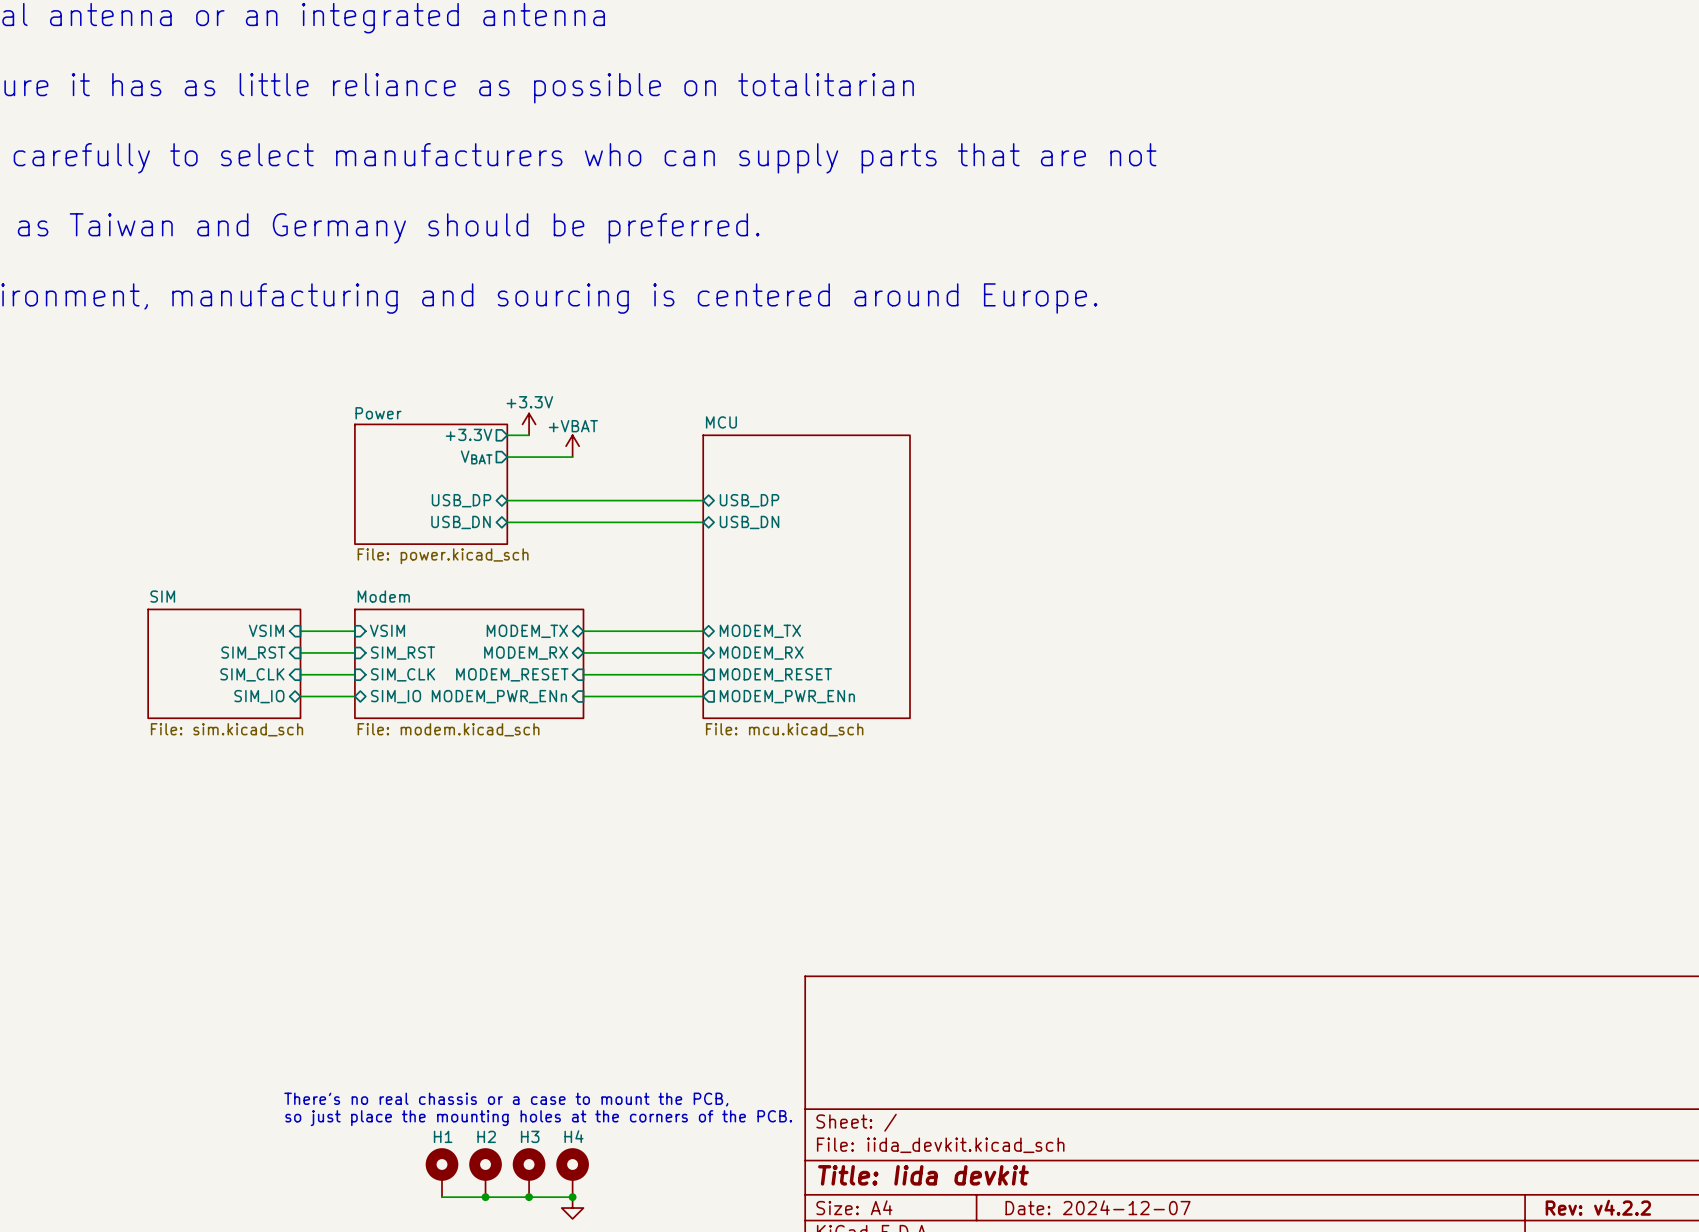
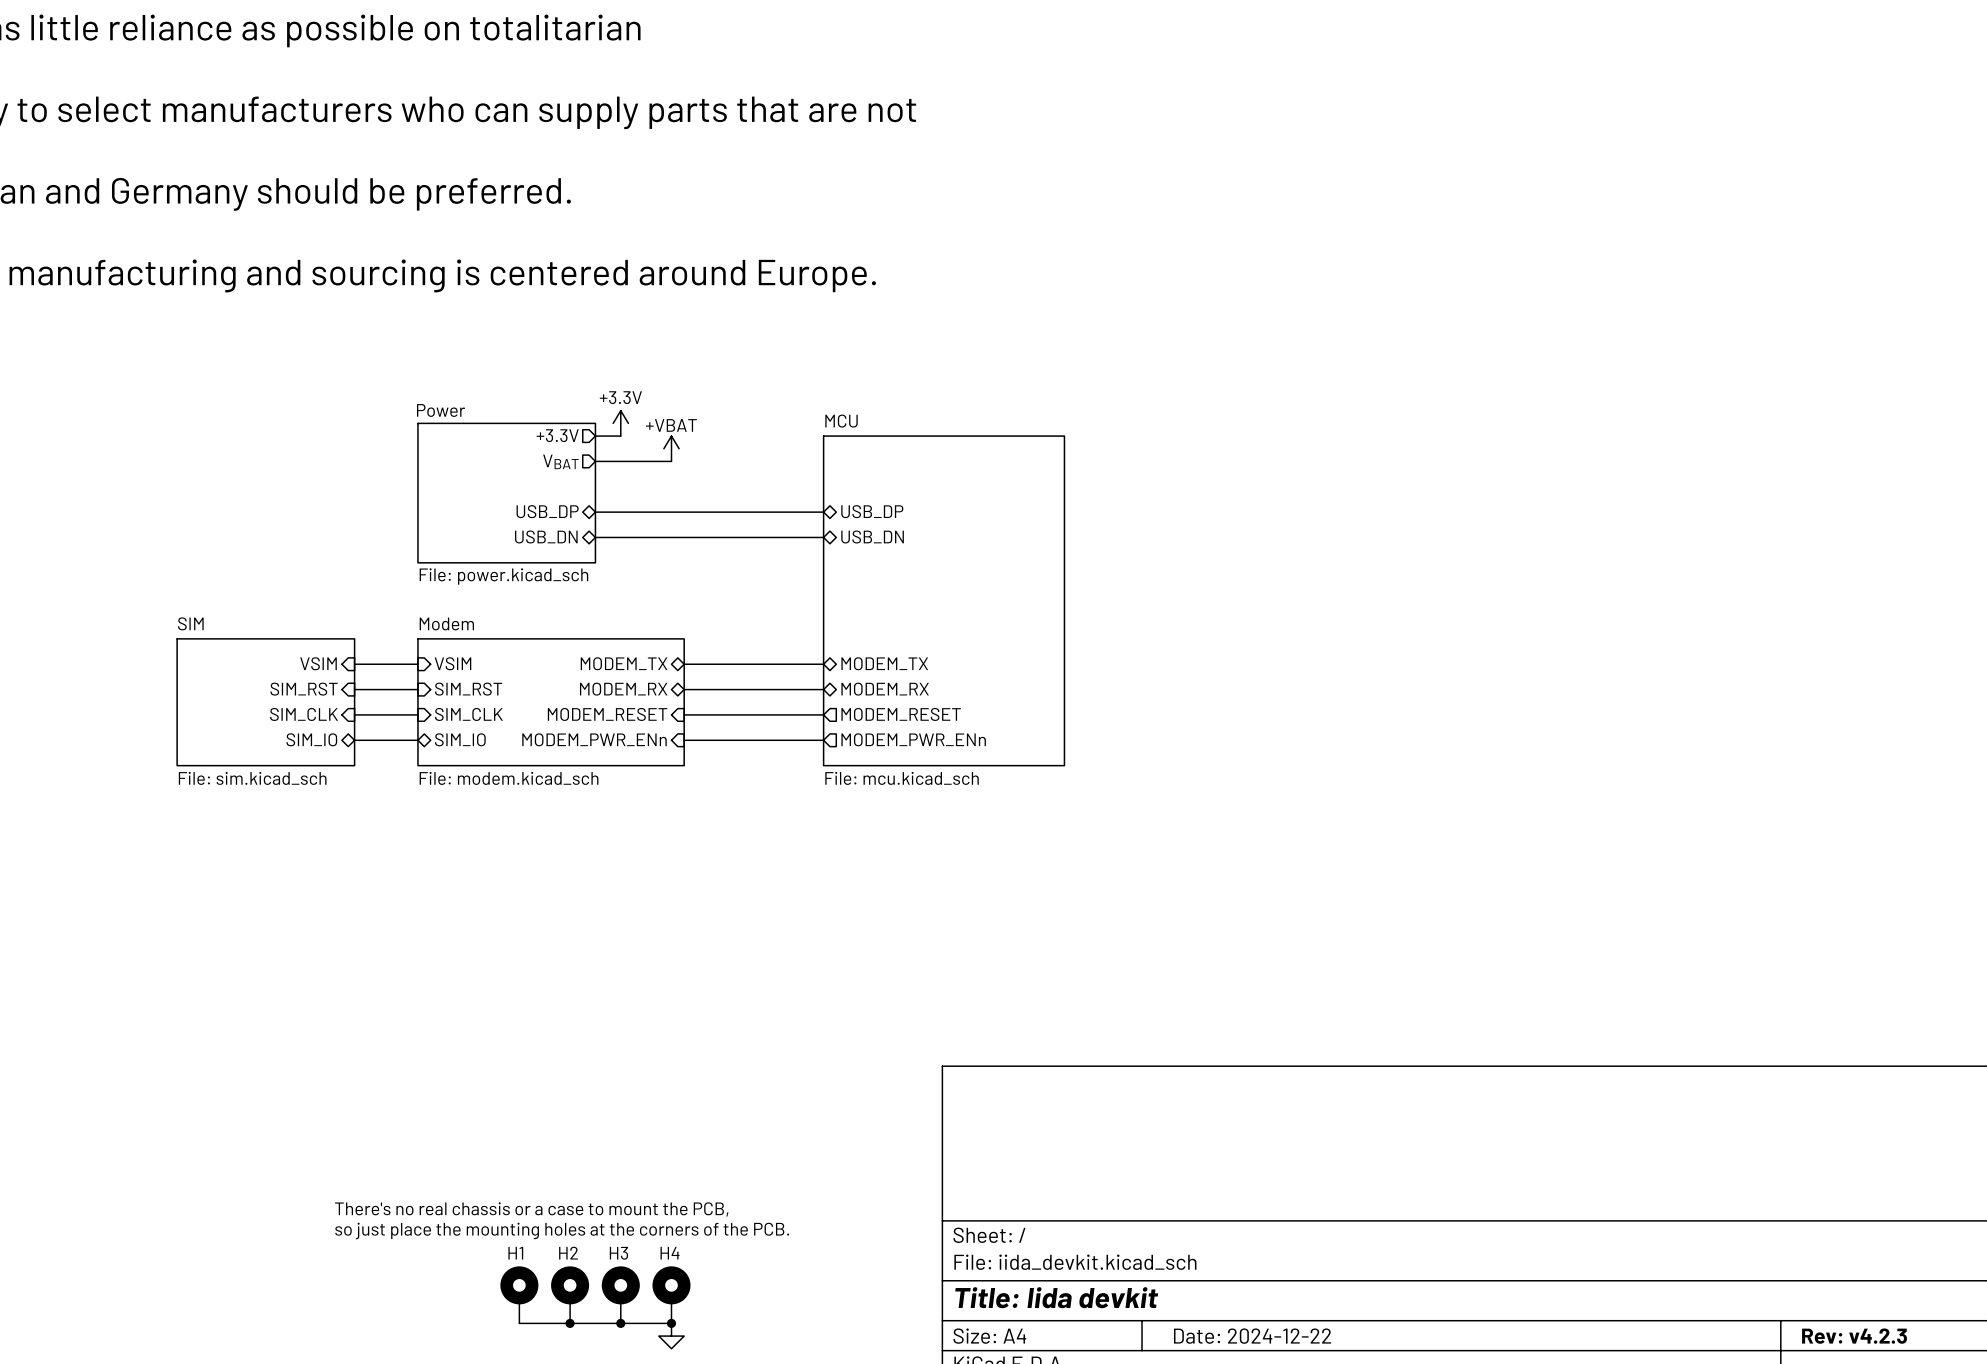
title block: Date: 2024-12-07 (1098, 1207) -> Date: 2024-12-22 (1252, 1336)
title block: Rev: v4.2.2 (1598, 1207) -> Rev: v4.2.3 (1854, 1336)

